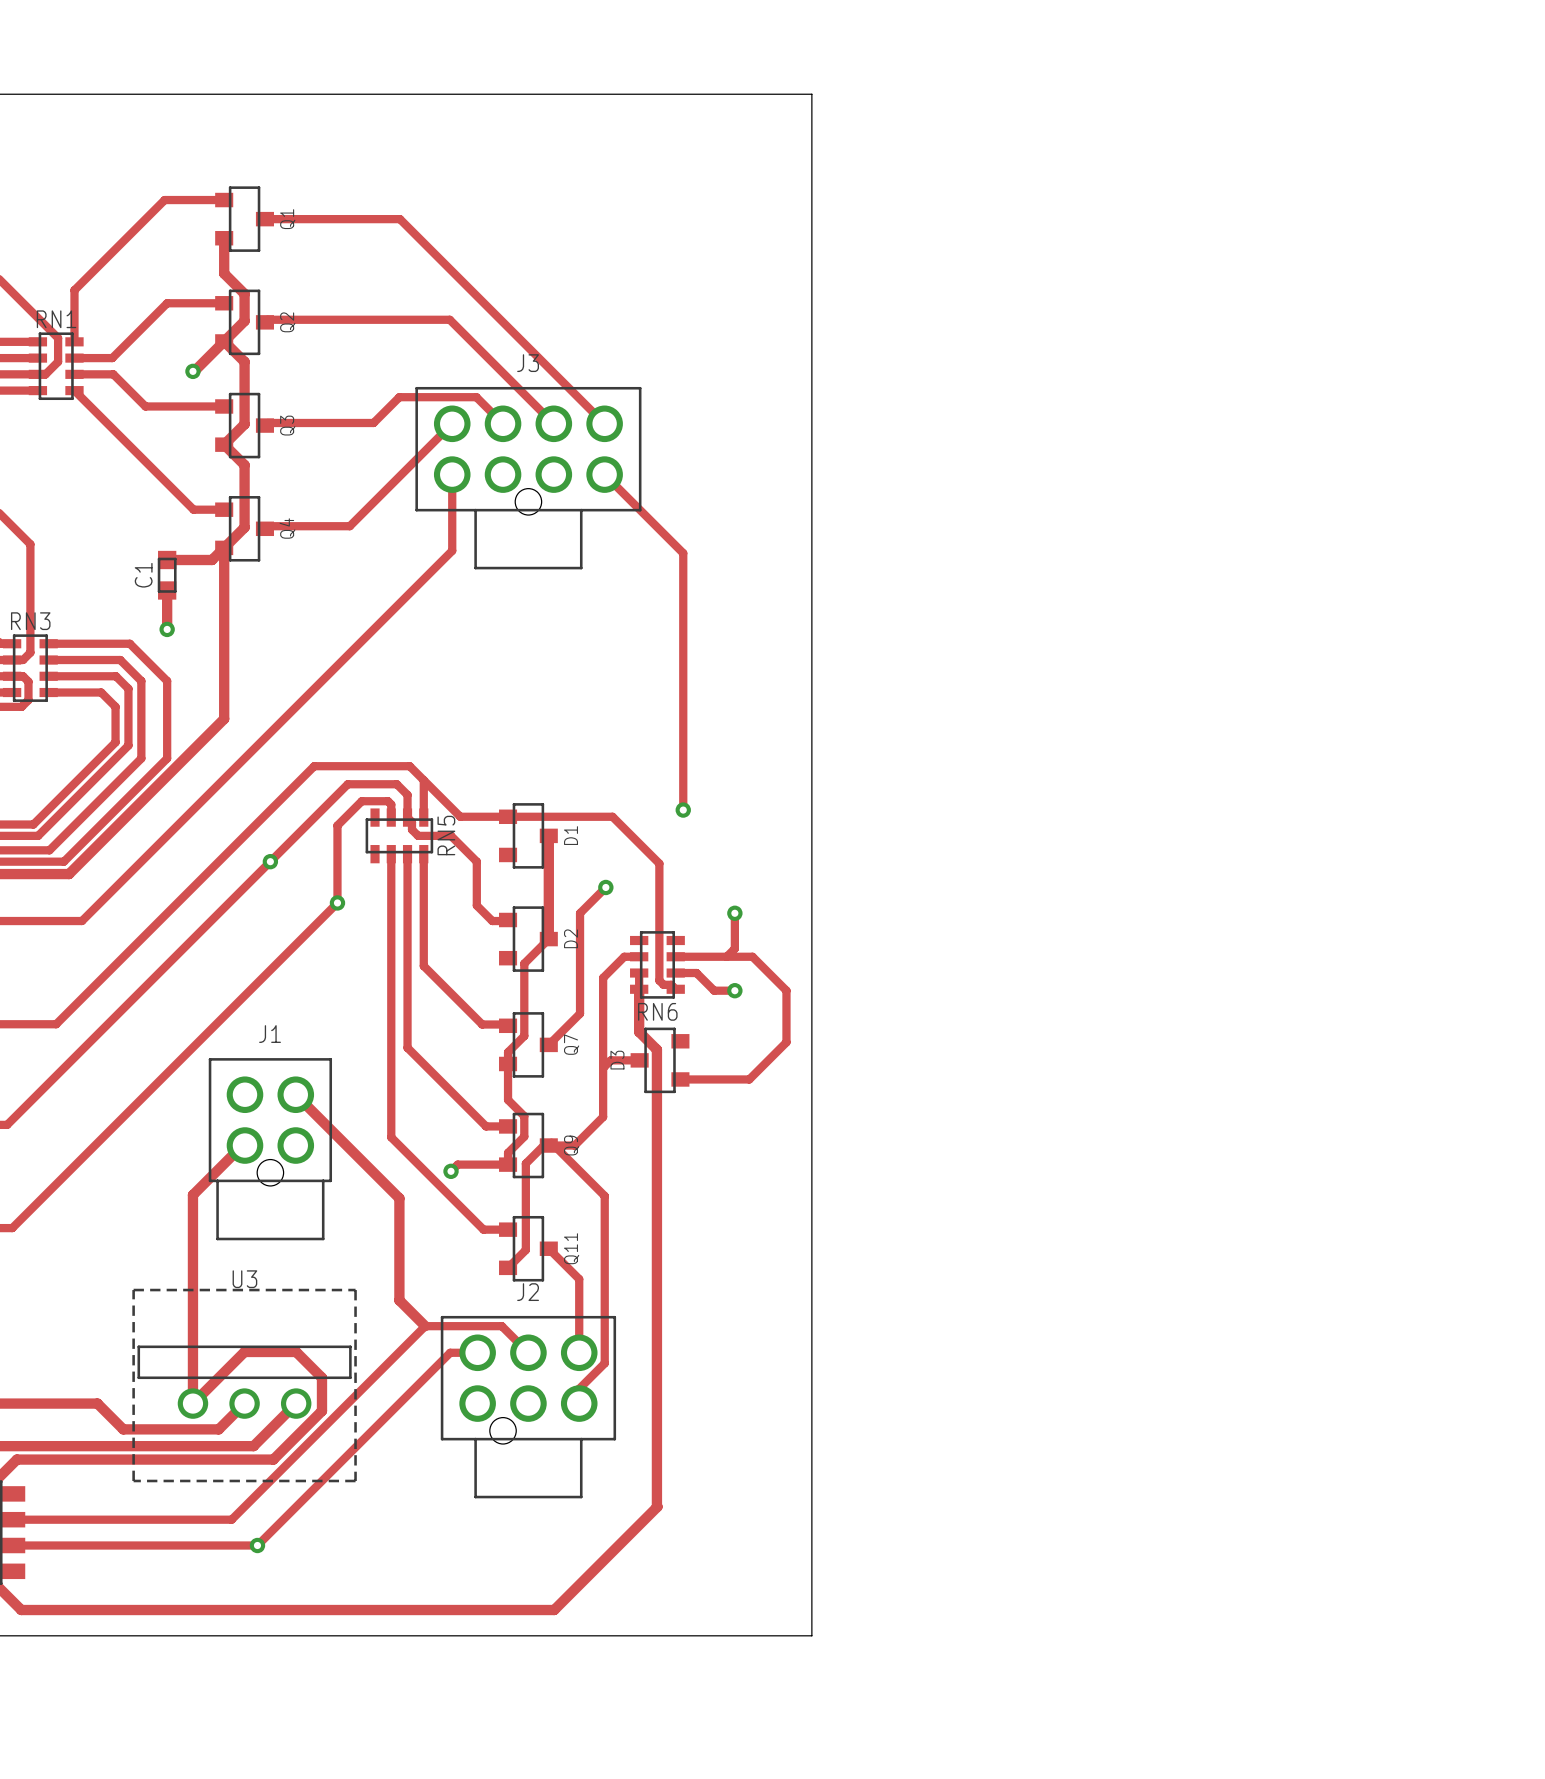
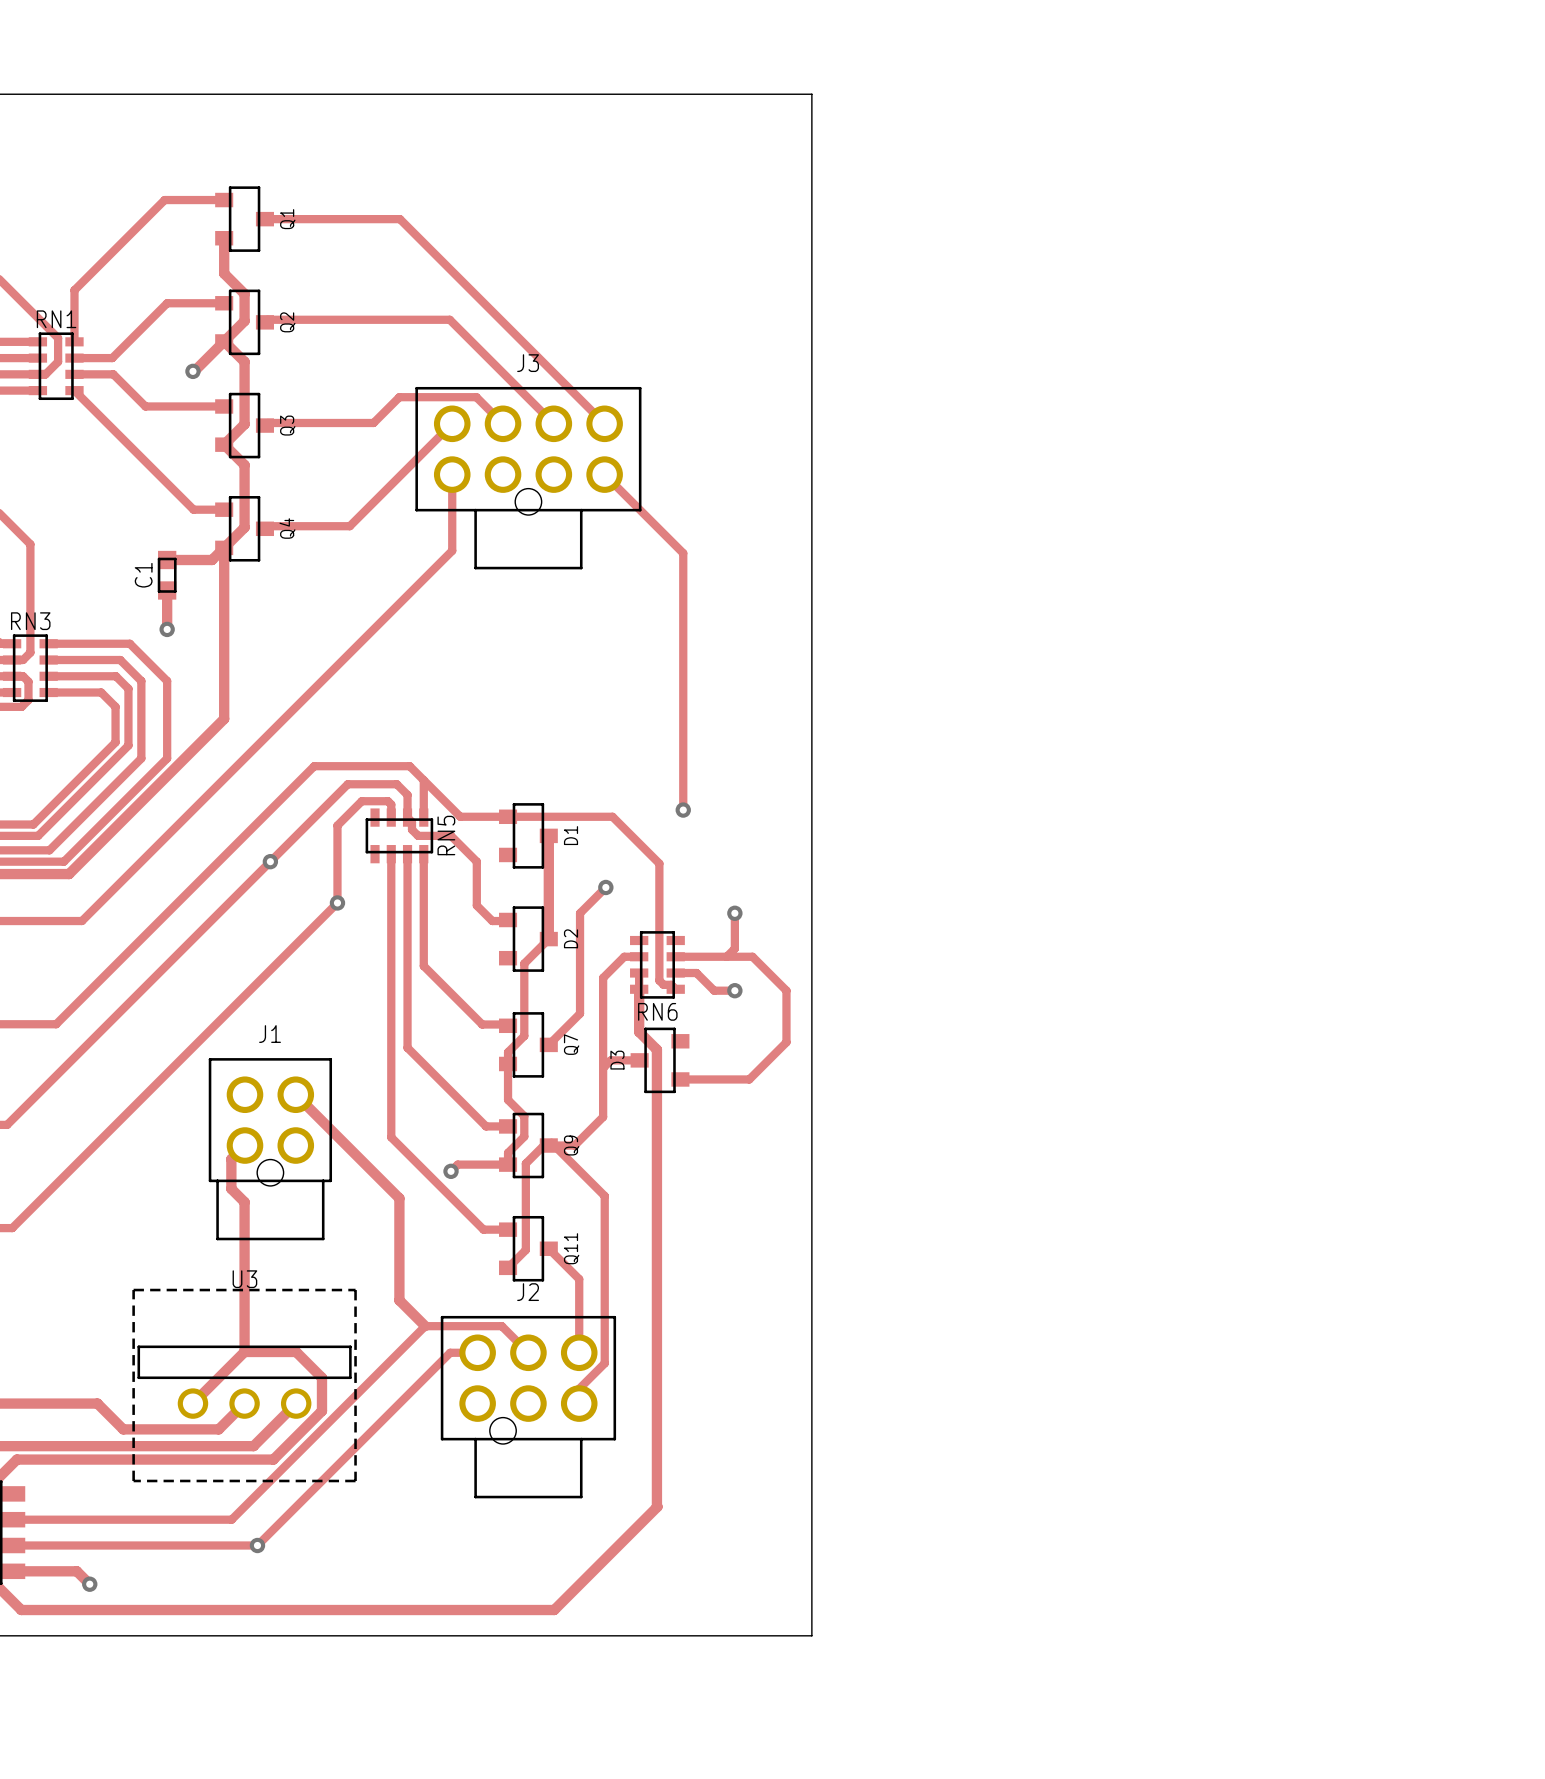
track: (243, 1144) (192, 1195) (192, 1403) -> none
track: none -> (244, 1145) (231, 1159) (231, 1188) (244, 1202) (244, 1351)
track: none -> (13, 1571) (76, 1571) (89, 1584)
via: none -> (89, 1584)

